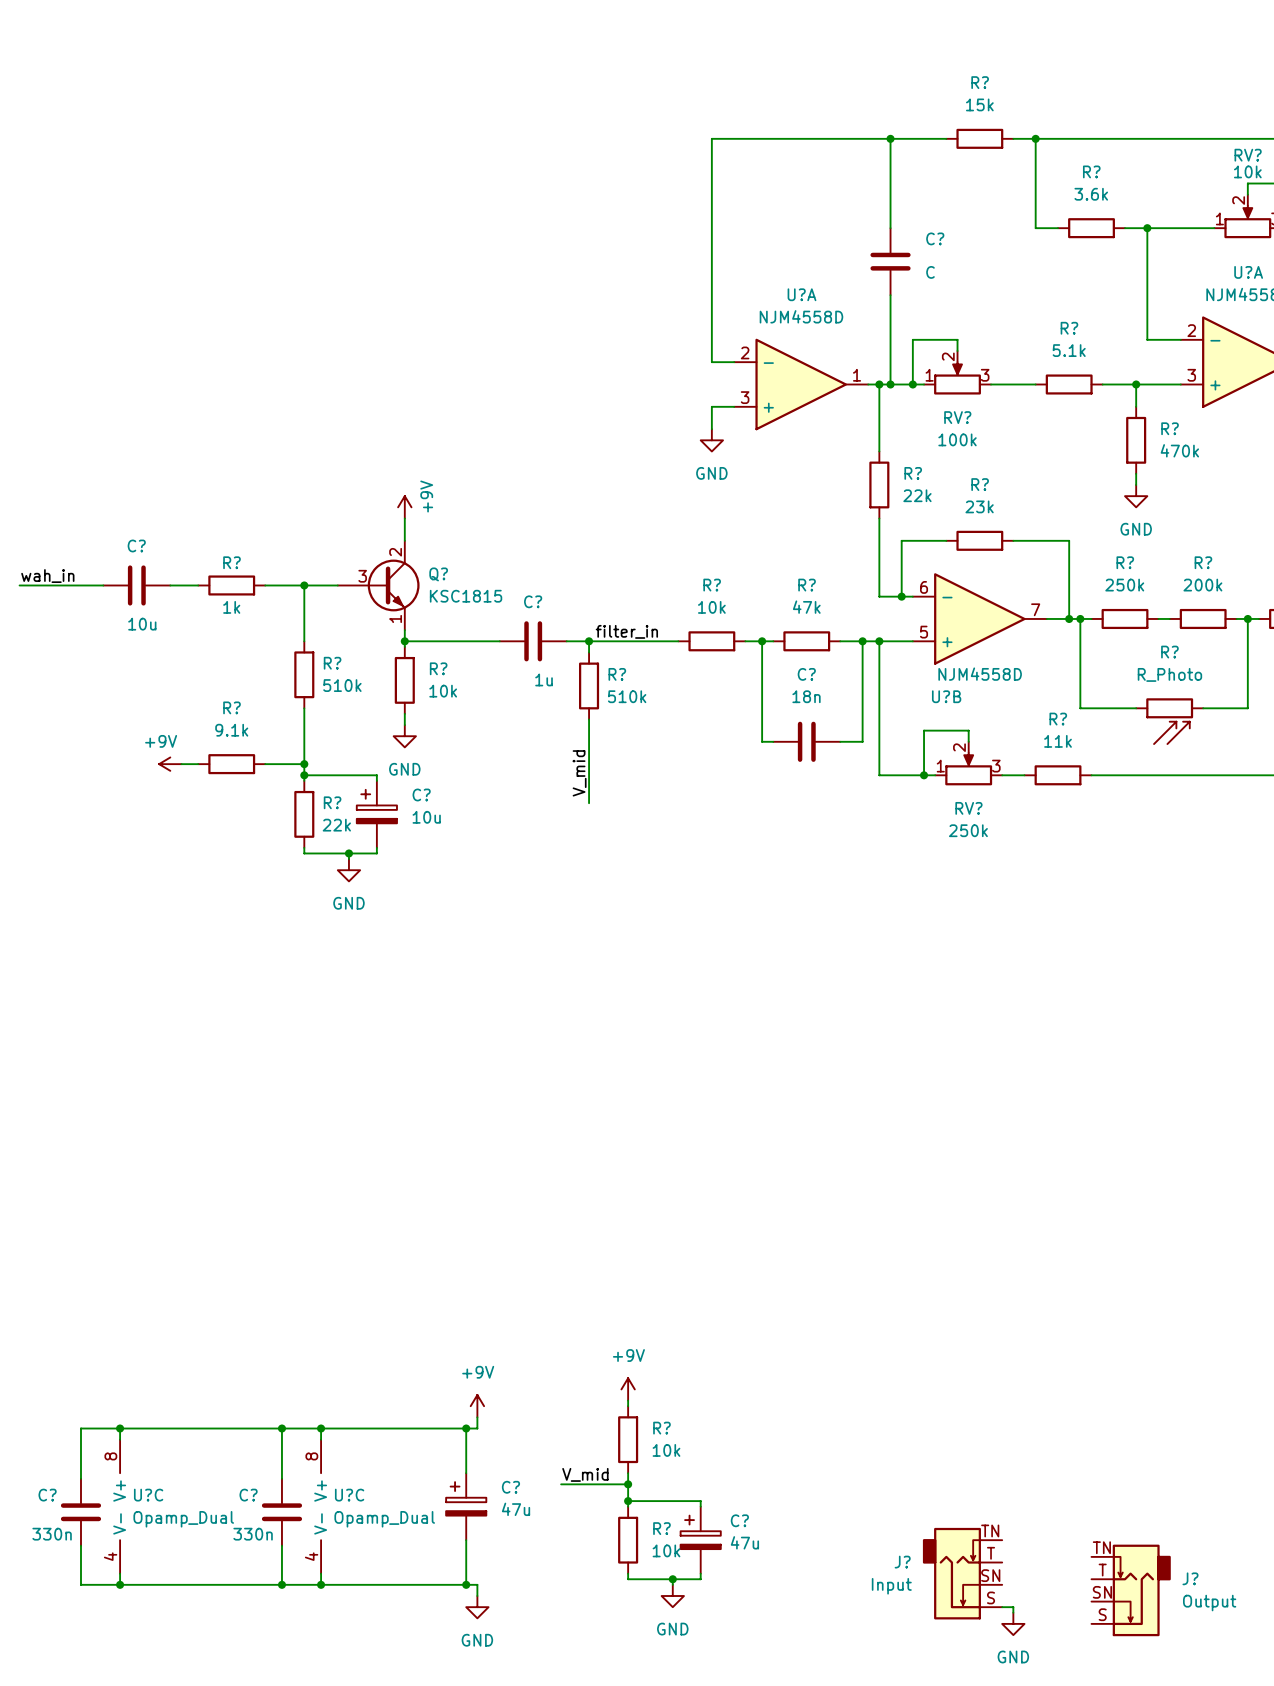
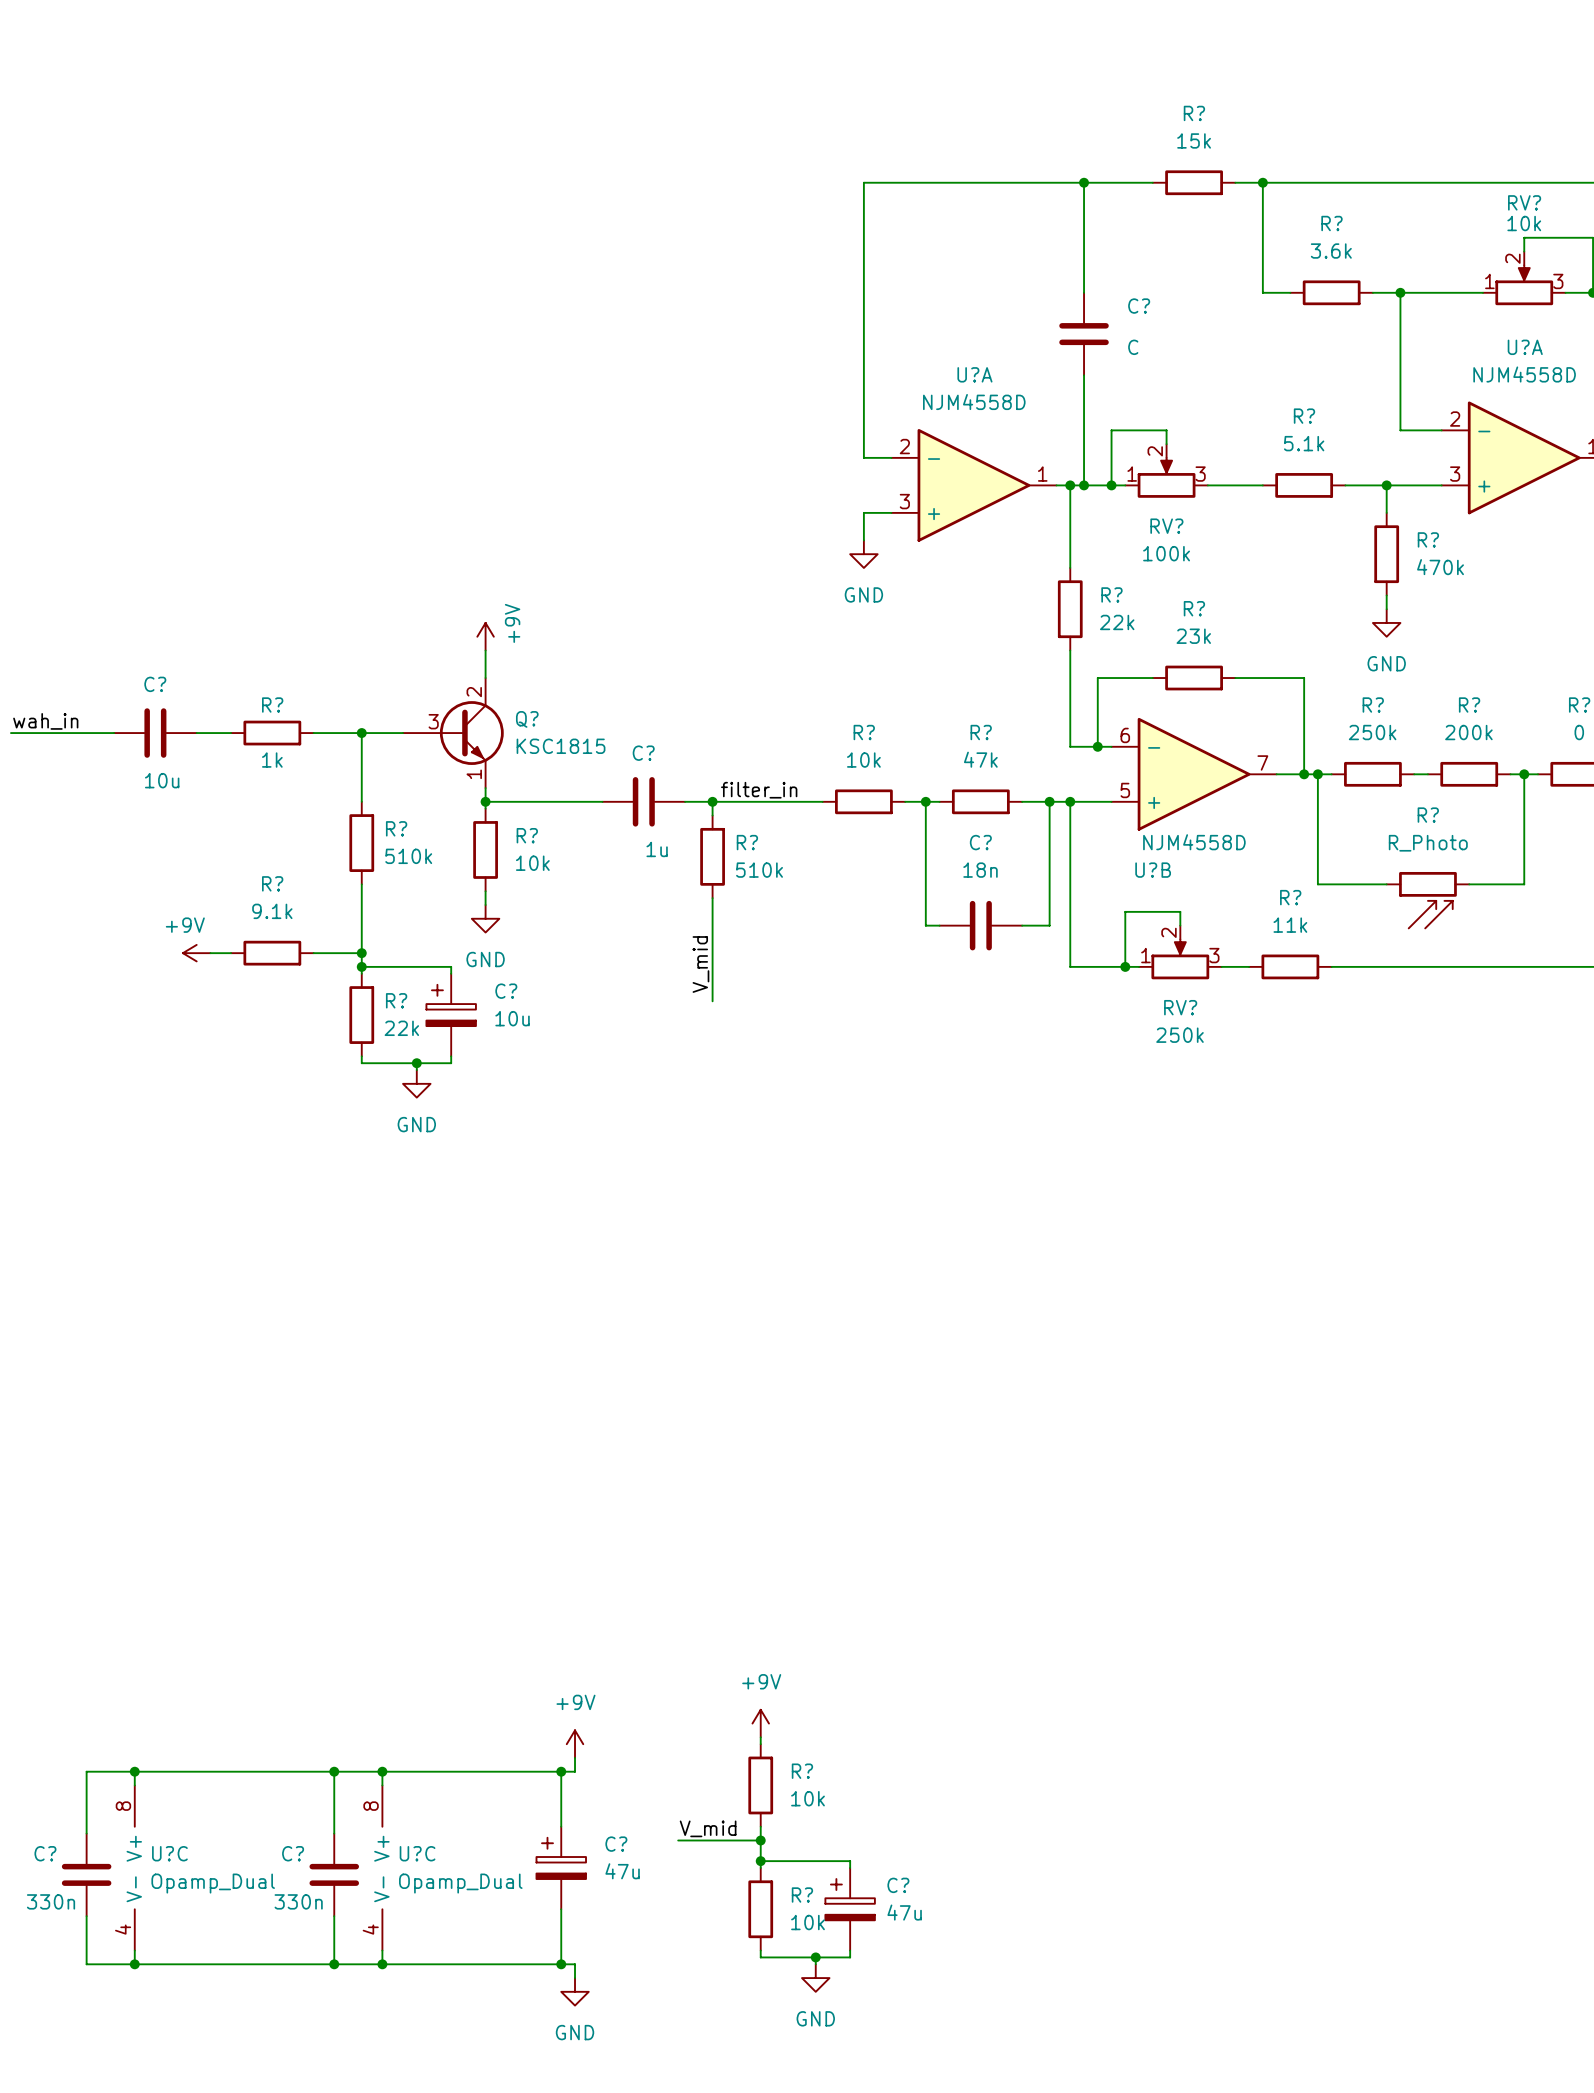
J?: Input (962, 1573) -> none
J?: Output (1131, 1590) -> none
wire: (1002, 1607) (1013, 1607) (1013, 1612) -> none
power symbol: GND (1013, 1623) -> none

